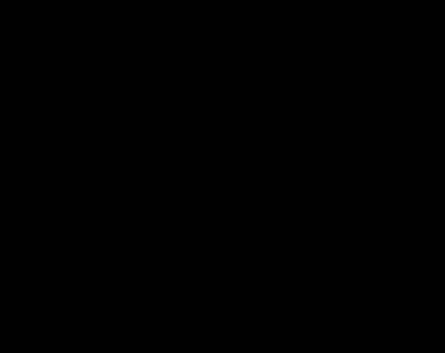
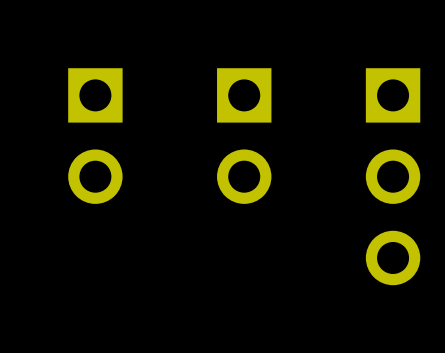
part: none -> (95, 136)
part: none -> (244, 136)
part: none -> (393, 176)

